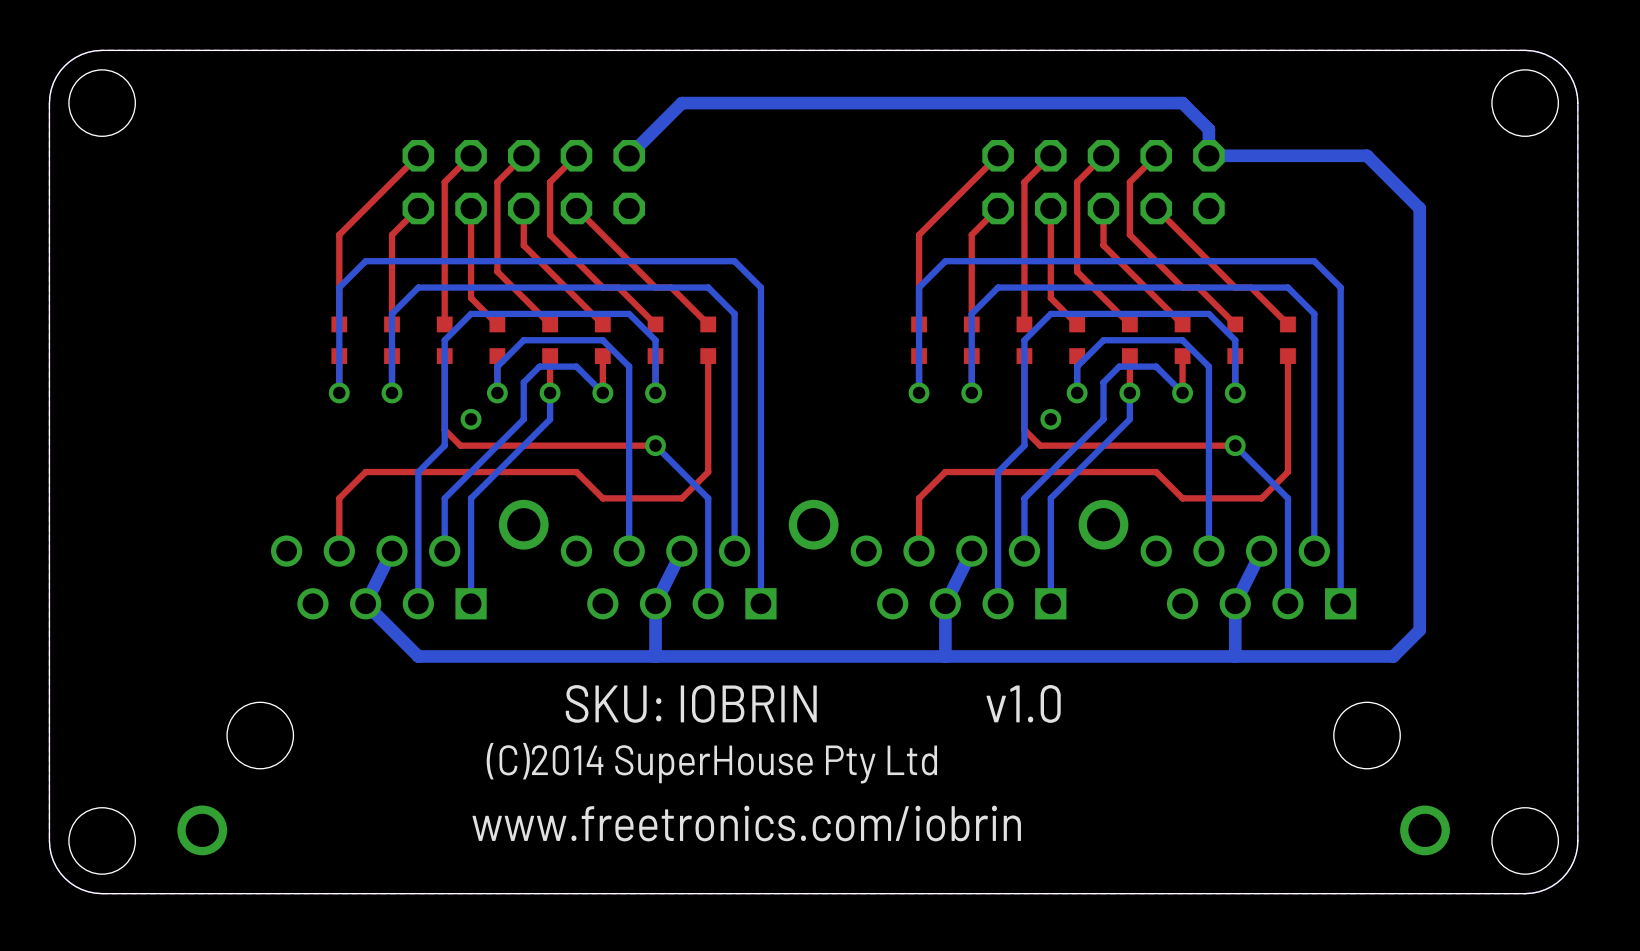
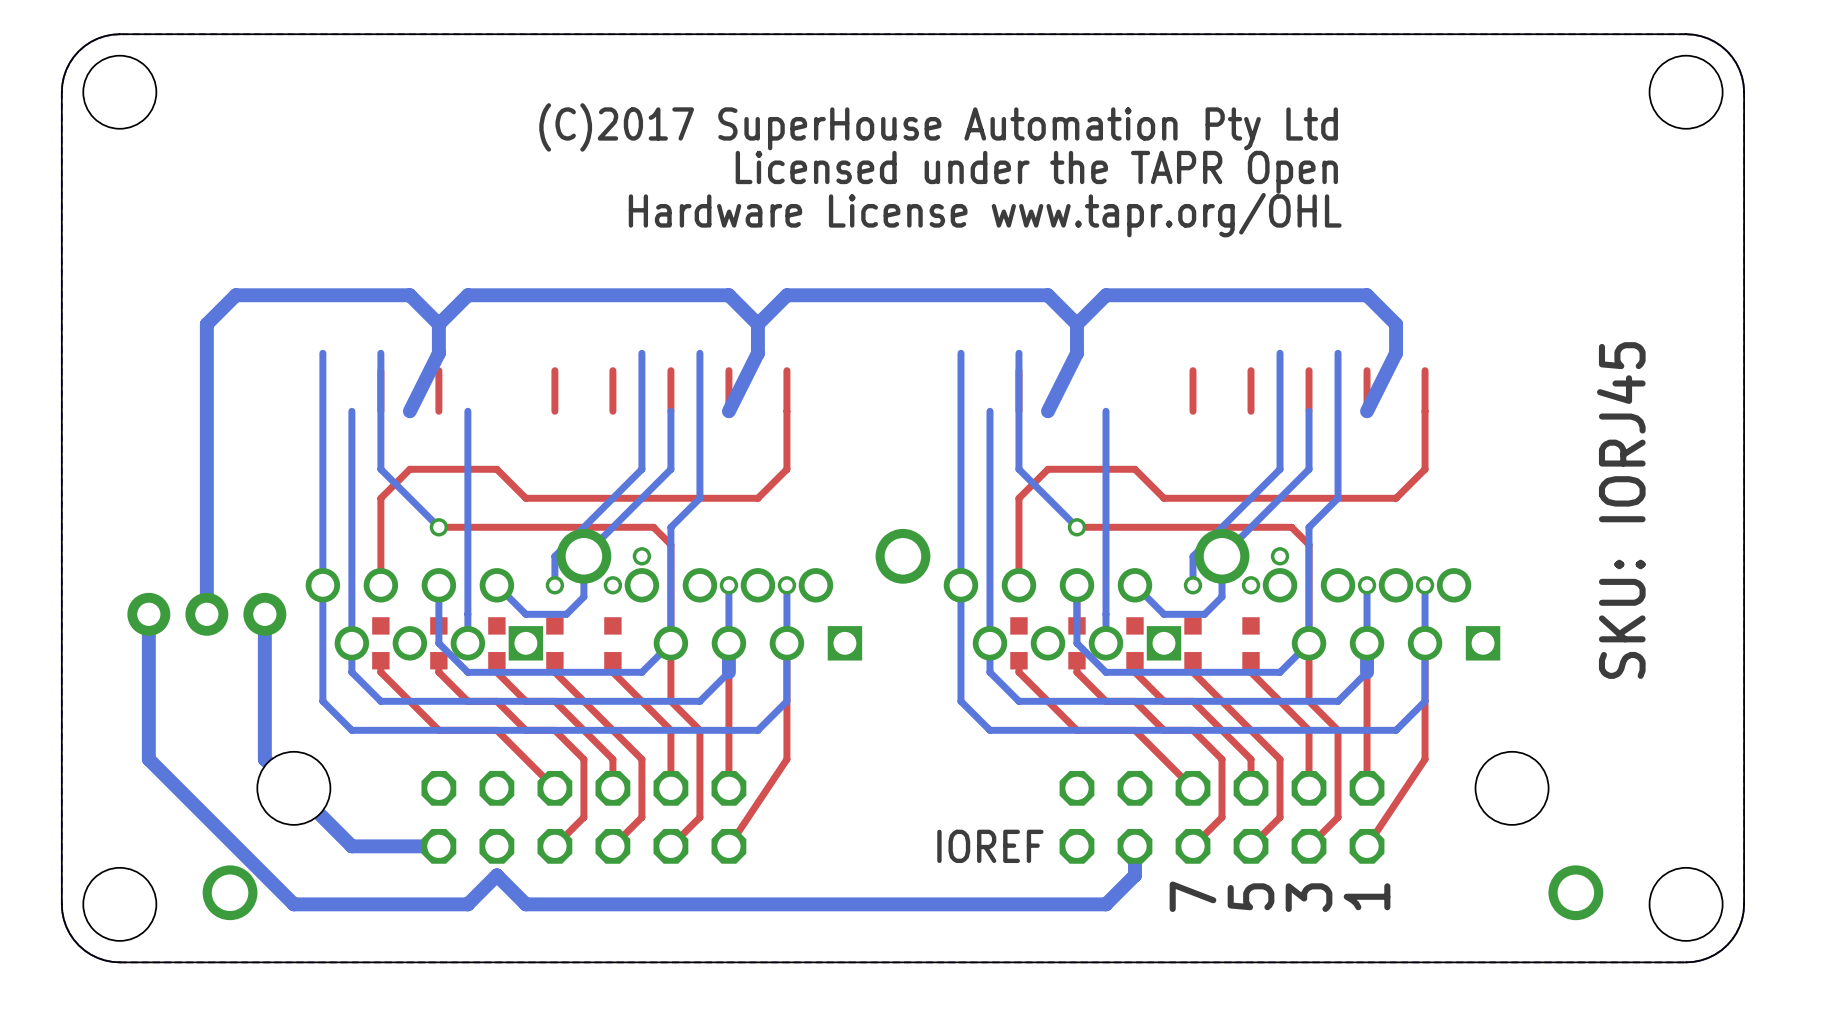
text: none -> (C)2017 SuperHouse Automation Pty Ltd (938, 127)
top track: (418, 155) (339, 234) (339, 324) -> none
top track: (471, 155) (444, 182) (444, 324) -> none
top track: (523, 155) (497, 182) (497, 271) (550, 324) -> none
top track: (576, 155) (550, 182) (550, 234) (602, 287) (618, 287) (655, 324) -> none
bottom track: (629, 155) (681, 103) (1182, 103) (1208, 129) (1208, 155) (1367, 155) (1419, 208) (1419, 630) (1393, 656) (1208, 656) -> none
top track: (998, 155) (919, 234) (919, 324) -> none
top track: (1050, 155) (1024, 182) (1024, 324) -> none
top track: (1103, 155) (1077, 182) (1077, 271) (1129, 324) -> none
top track: (1156, 155) (1129, 182) (1129, 234) (1182, 287) (1198, 287) (1235, 324) -> none
text: none -> Licensed under the TAPR Open (1036, 172)
part: (523, 182) -> none
part: (1103, 182) -> none
top track: (418, 208) (392, 234) (392, 324) -> none
top track: (471, 208) (471, 298) (497, 324) -> none
top track: (523, 208) (523, 245) (602, 324) -> none
top track: (576, 208) (655, 287) (671, 287) (708, 324) -> none
top track: (998, 208) (971, 234) (971, 324) -> none
top track: (1050, 208) (1050, 298) (1077, 324) -> none
top track: (1103, 208) (1103, 245) (1182, 324) -> none
top track: (1156, 208) (1235, 287) (1251, 287) (1287, 324) -> none
text: none -> Hardware License www.tapr.org/OHL (985, 215)
bottom track: (655, 287) (708, 287) (734, 313) (734, 551) -> (728, 295) (757, 324)
bottom track width: thin (655, 287) (418, 287) (392, 313) (392, 340) -> thick (728, 295) (467, 295) (438, 324) (438, 353)
bottom track: (1235, 287) (1287, 287) (1314, 313) (1314, 551) -> (1367, 295) (1396, 324) (1396, 353) (1367, 411)
bottom track width: thin (1235, 287) (998, 287) (971, 313) (971, 340) -> thick (1367, 295) (1105, 295) (1076, 324) (1076, 353)
bottom track: none -> (438, 324) (409, 295) (235, 295) (206, 324) (206, 614)
bottom track: none -> (757, 324) (757, 353) (728, 411)
bottom track: none -> (1076, 324) (1047, 295) (786, 295) (757, 324)
bottom track: none -> (322, 353) (322, 701) (351, 730) (757, 730) (786, 701) (786, 643)
bottom track: (339, 340) (339, 287) (365, 261) (734, 261) (760, 287) (760, 603) -> none
part: (339, 340) -> none
bottom track: (392, 340) (392, 392) -> (438, 353) (409, 411)
part: (392, 340) -> none
part: (444, 340) -> none
part: (497, 340) -> none
part: (550, 340) -> none
bottom track: none -> (641, 353) (641, 469) (554, 556) (554, 585)
part: (602, 340) -> none
part: (655, 340) -> none
part: (708, 340) -> none
bottom track: none -> (960, 353) (960, 701) (989, 730) (1396, 730) (1425, 701) (1425, 643)
bottom track: (919, 340) (919, 287) (945, 261) (1314, 261) (1340, 287) (1340, 603) -> none
part: (919, 340) -> none
bottom track: (971, 340) (971, 392) -> (1076, 353) (1047, 411)
part: (971, 340) -> none
part: (1024, 340) -> none
part: (1077, 340) -> none
part: (1129, 340) -> none
bottom track: none -> (1280, 353) (1280, 469) (1193, 556) (1193, 585)
part: (1182, 340) -> none
part: (1235, 340) -> none
part: (1287, 340) -> none
top track: (444, 356) (444, 429) (460, 445) (655, 445) -> none
top track: (1024, 356) (1024, 429) (1040, 445) (1235, 445) -> none
bottom track: (629, 366) (602, 340) (523, 340) (497, 366) (497, 392) -> (699, 382) (699, 353)
bottom track: (1208, 366) (1182, 340) (1103, 340) (1077, 366) (1077, 392) -> (1338, 382) (1338, 353)
bottom track: none -> (380, 411) (380, 469) (438, 527)
via: (339, 392) -> none
via: (392, 392) -> none
via: (497, 392) -> none
bottom track: (550, 392) (550, 419) (471, 498) (471, 603) -> none
via: (550, 392) -> none
bottom track: (602, 392) (576, 366) (539, 366) (523, 382) (523, 419) (444, 498) (444, 551) -> (670, 411) (670, 469) (583, 556) (583, 596) (566, 614) (525, 614) (496, 585)
via: (602, 392) -> none
bottom track: (655, 392) (655, 340) (629, 313) (471, 313) (444, 340) (444, 445) (418, 472) -> (467, 411) (467, 498)
via: (655, 392) -> none
bottom track: none -> (1018, 411) (1018, 469) (1076, 527)
via: (919, 392) -> none
via: (971, 392) -> none
via: (1077, 392) -> none
bottom track: (1129, 392) (1129, 419) (1050, 498) (1050, 603) -> none
via: (1129, 392) -> none
bottom track: (1182, 392) (1156, 366) (1119, 366) (1103, 382) (1103, 419) (1024, 498) (1024, 551) -> (1309, 411) (1309, 469) (1222, 556) (1222, 596) (1204, 614) (1164, 614) (1134, 585)
via: (1182, 392) -> none
bottom track: (1235, 392) (1235, 340) (1208, 313) (1050, 313) (1024, 340) (1024, 445) (998, 472) -> (1105, 411) (1105, 498)
via: (1235, 392) -> none
via: (471, 419) -> none
via: (1050, 419) -> none
bottom track: (655, 445) (708, 498) (708, 551) -> none
via: (655, 445) -> none
top track: (708, 445) (708, 472) (681, 498) (602, 498) (576, 472) -> (786, 469) (757, 498) (641, 498)
bottom track: (1235, 445) (1287, 498) (1287, 551) -> none
via: (1235, 445) -> none
top track: (1287, 445) (1287, 472) (1261, 498) (1182, 498) (1156, 472) -> (1425, 469) (1396, 498) (1280, 498)
top track: (471, 472) (365, 472) (339, 498) -> (525, 498) (496, 469) (409, 469) (380, 498) (380, 527)
bottom track: (629, 472) (629, 551) -> (699, 498) (670, 527) (670, 643) (641, 672) (467, 672) (438, 643) (438, 585)
top track: (1050, 472) (945, 472) (919, 498) -> (1164, 498) (1134, 469) (1047, 469) (1018, 498) (1018, 527)
bottom track: (1208, 472) (1208, 551) -> (1338, 498) (1309, 527) (1309, 643) (1280, 672) (1105, 672) (1076, 643) (1076, 585)
top track: none -> (438, 527) (653, 527) (670, 544) (670, 625)
via: none -> (438, 527)
top track: none -> (1076, 527) (1291, 527) (1309, 544) (1309, 625)
via: none -> (1076, 527)
text: none -> SKU: IORJ45 (1621, 510)
via: none -> (641, 556)
via: none -> (1280, 556)
bottom track: (392, 551) (365, 603) (418, 656) -> (351, 411) (351, 672) (380, 701) (467, 701)
via: none -> (554, 585)
via: none -> (612, 585)
via: none -> (728, 585)
bottom track: (681, 551) (655, 603) -> (728, 585) (728, 643)
via: none -> (786, 585)
bottom track: (971, 551) (945, 603) (945, 656) -> none
via: none -> (1193, 585)
via: none -> (1251, 585)
via: none -> (1367, 585)
bottom track: (1261, 551) (1235, 603) -> (1367, 585) (1367, 643)
via: none -> (1425, 585)
bottom track: none -> (148, 614) (148, 759) (293, 904) (467, 904) (496, 875) (525, 904) (1105, 904) (1134, 875) (1134, 846)
part: none -> (206, 614)
bottom track: none -> (264, 614) (264, 759) (351, 846) (438, 846)
part: none -> (380, 643)
part: none -> (438, 643)
part: none -> (496, 643)
part: none -> (554, 643)
part: none -> (612, 643)
part: none -> (1018, 643)
part: none -> (1076, 643)
part: none -> (1134, 643)
part: none -> (1193, 643)
part: none -> (1251, 643)
top track: none -> (380, 660) (380, 672) (438, 730) (496, 730) (554, 788)
top track: none -> (438, 660) (438, 672) (467, 701) (496, 701) (525, 730) (554, 730) (583, 759) (583, 817) (554, 846)
top track: none -> (496, 660) (496, 672) (525, 701) (554, 701) (612, 759) (612, 788)
top track: none -> (554, 660) (554, 672) (641, 759) (641, 817) (612, 846)
top track: none -> (612, 660) (612, 672) (670, 730) (670, 788)
top track: none -> (670, 660) (670, 701) (699, 730) (699, 817) (670, 846)
top track: none -> (728, 660) (728, 788)
top track: none -> (786, 660) (786, 759) (728, 846)
top track: none -> (1018, 660) (1018, 672) (1076, 730) (1134, 730) (1193, 788)
top track: none -> (1076, 660) (1076, 672) (1105, 701) (1134, 701) (1164, 730) (1193, 730) (1222, 759) (1222, 817) (1193, 846)
top track: none -> (1134, 660) (1134, 672) (1164, 701) (1193, 701) (1251, 759) (1251, 788)
top track: none -> (1193, 660) (1193, 672) (1280, 759) (1280, 817) (1251, 846)
top track: none -> (1251, 660) (1251, 672) (1309, 730) (1309, 788)
top track: none -> (1309, 660) (1309, 701) (1338, 730) (1338, 817) (1309, 846)
top track: none -> (1367, 660) (1367, 788)
top track: none -> (1425, 660) (1425, 759) (1367, 846)
bottom track: (655, 630) (655, 656) -> (728, 672) (699, 701)
bottom track: (1235, 630) (1235, 656) -> (1367, 672) (1338, 701)
bottom track width: thick (629, 656) (418, 656) -> thin (699, 701) (467, 701)
bottom track: (919, 656) (629, 656) -> (1018, 701) (989, 672) (989, 411)
bottom track width: thick (1208, 656) (919, 656) -> thin (1338, 701) (1018, 701)
text: SKU: IOBRIN (691, 703) -> none
text: v1.0 (1023, 703) -> none
part: none -> (583, 817)
part: none -> (1222, 817)
text: (C)2014 SuperHouse Pty Ltd (711, 763) -> none
text: none -> IOREF (990, 846)
text: www.freetronics.com/iobrin (746, 823) -> none
text: none -> 1 (1367, 896)
text: none -> 7 (1193, 896)
text: none -> 5 (1251, 896)
text: none -> 3 (1309, 897)

